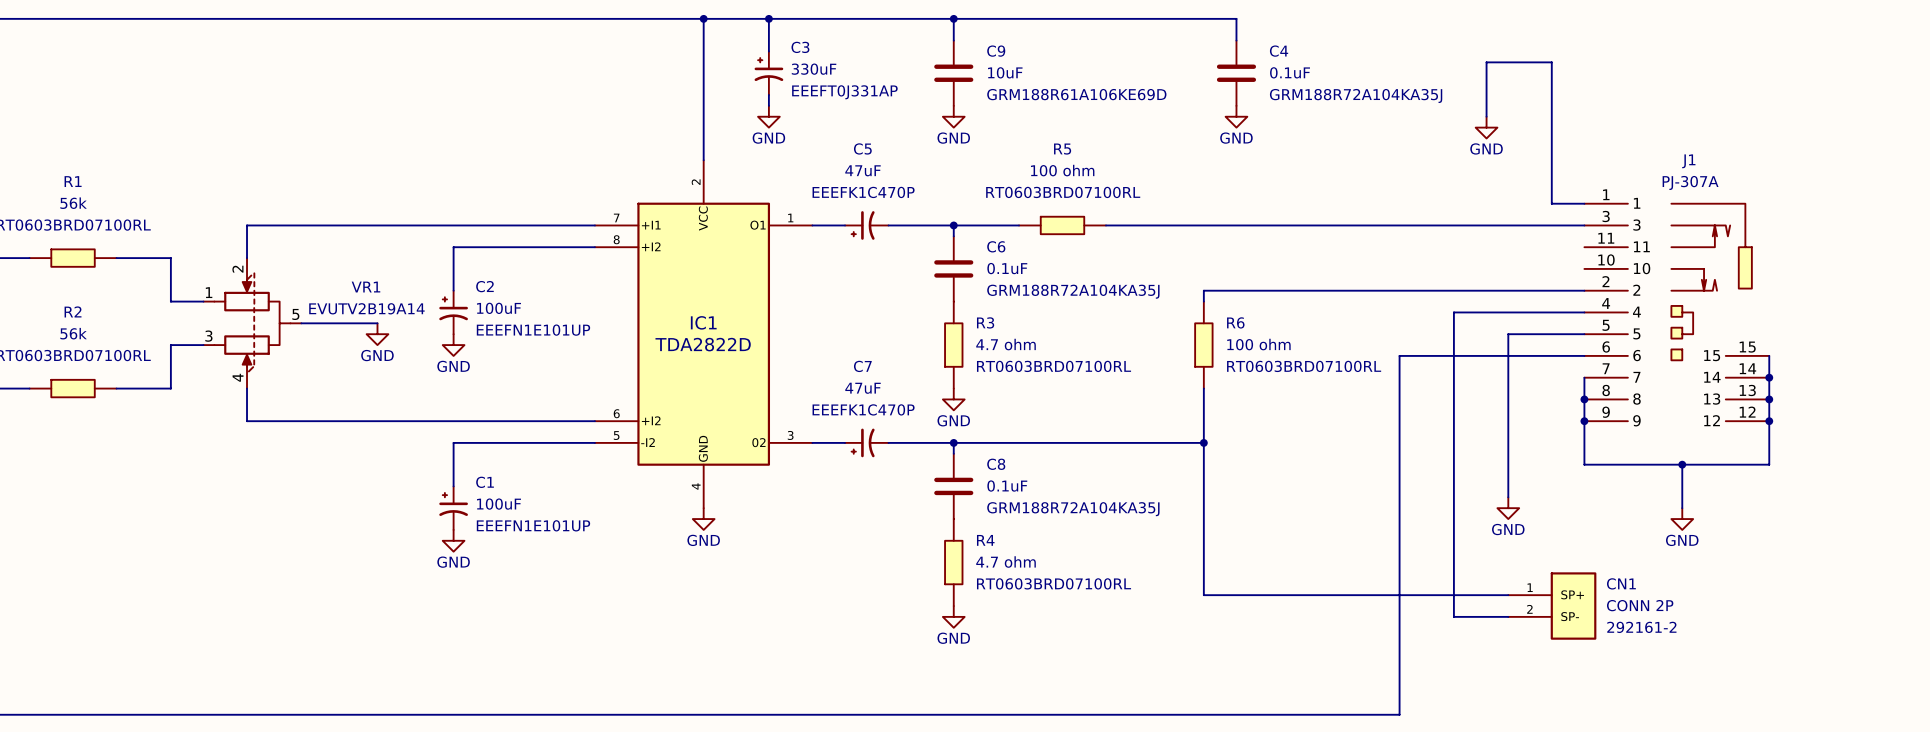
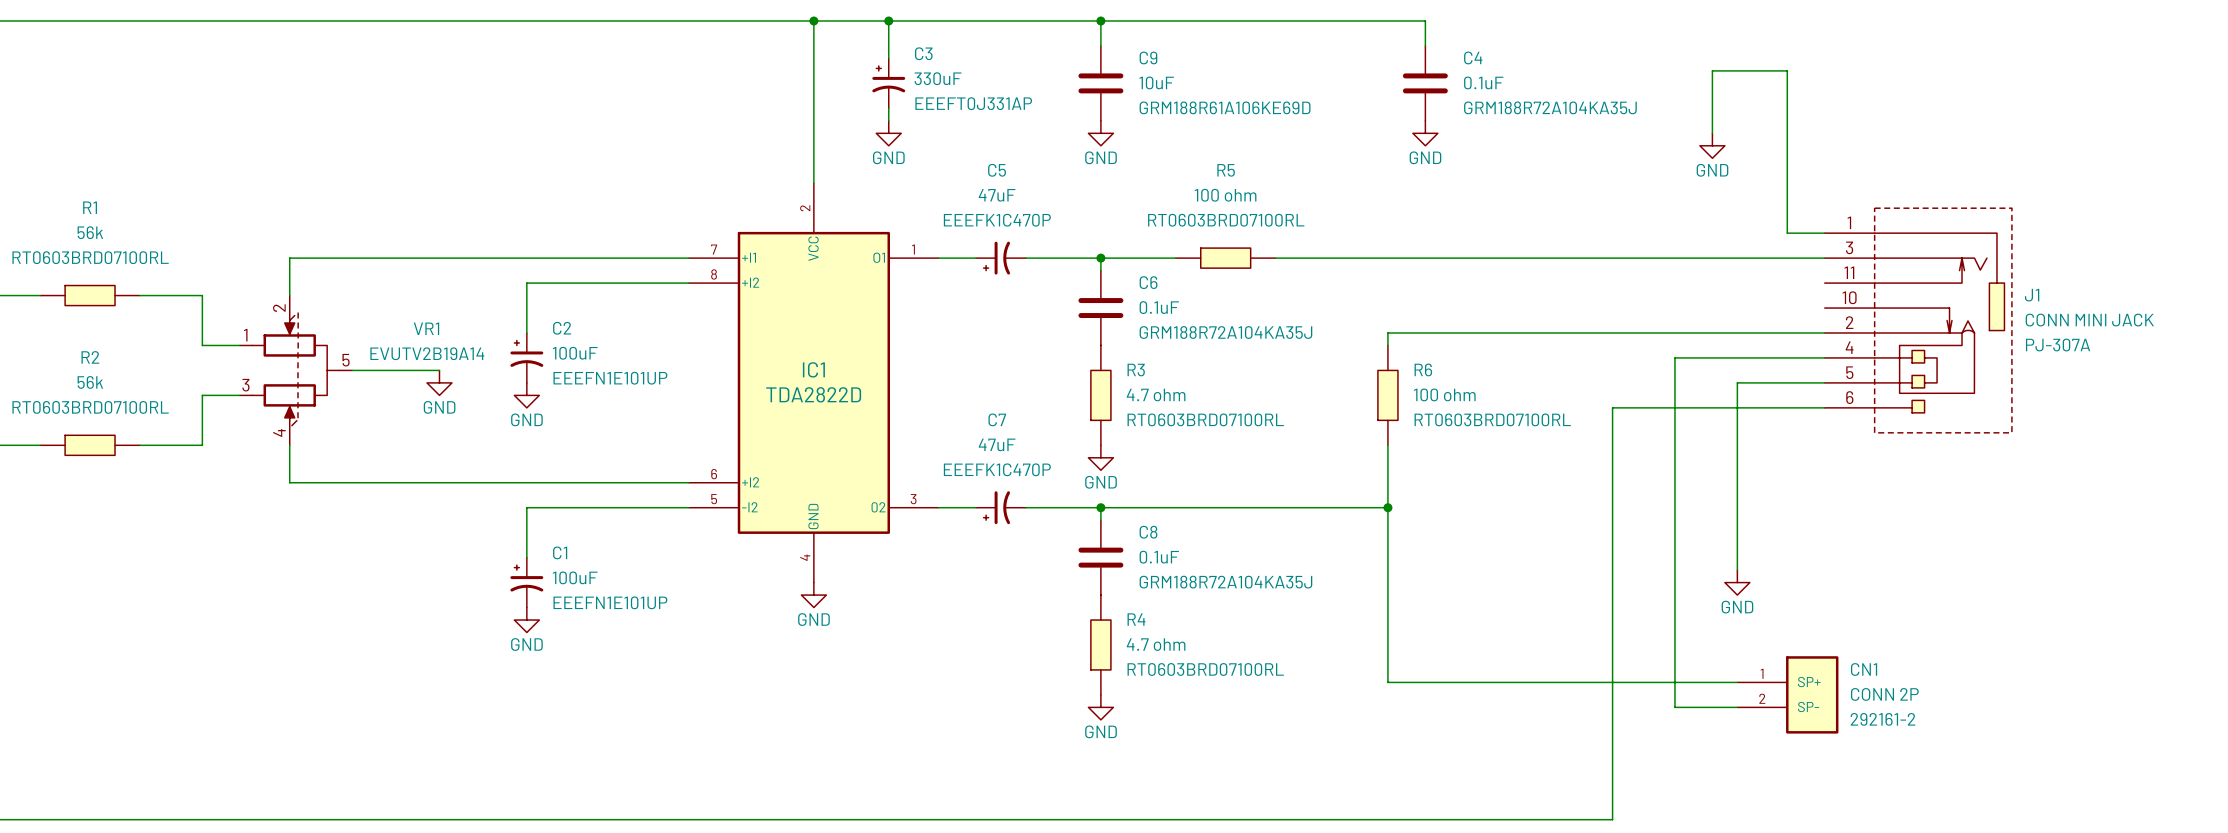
J1 name position: J1 (1688, 161) -> J1 (2032, 295)
J1 value: PJ-307A (1690, 182) -> CONN MINI JACK (2089, 320)
J1 symbol: [1584, 203, 1770, 422] -> [1824, 208, 2012, 433]
J1 text: none -> PJ-307A (2058, 345)
wire: (1769, 355) (1769, 464) (1584, 464) (1584, 377) -> none
junction: (1769, 377) -> none
junction: (1584, 399) -> none
junction: (1769, 399) -> none
junction: (1584, 421) -> none
junction: (1769, 421) -> none
wire: (1682, 464) (1682, 508) -> none
junction: (1682, 464) -> none
power symbol: GND (1682, 519) -> none

